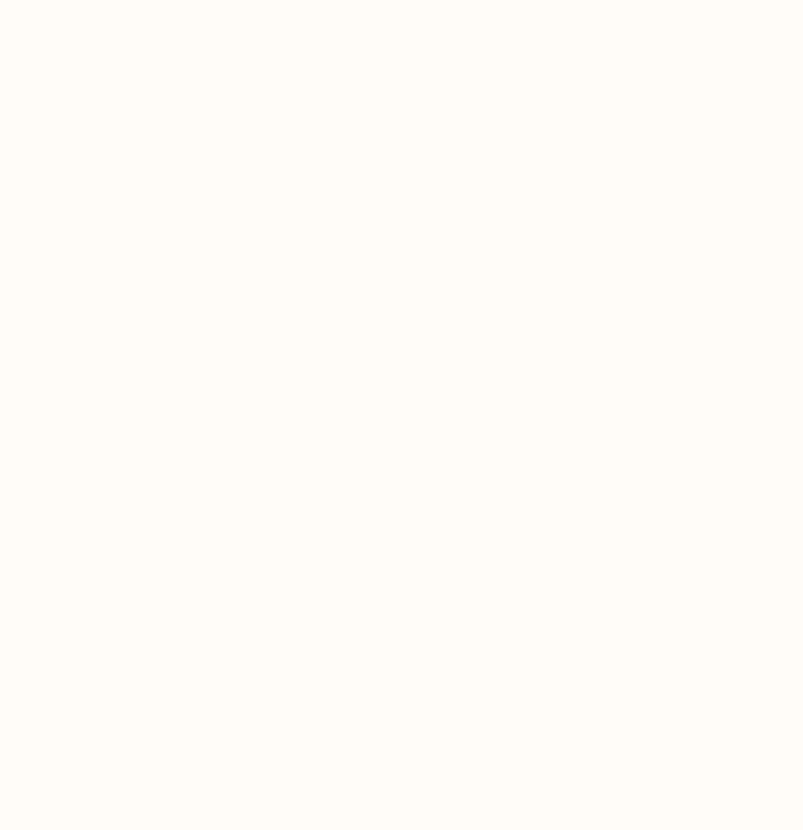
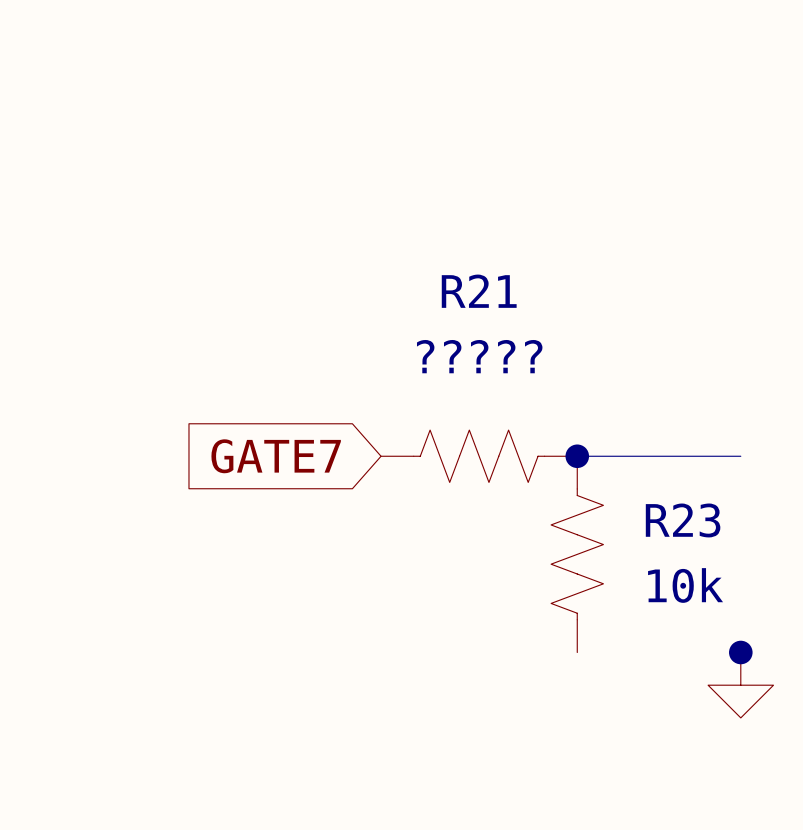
global label: none -> GATE7 (276, 456)
R21: none -> ????? (479, 456)
wire: none -> (577, 456) (740, 456)
junction: none -> (577, 456)
R23: none -> 10k (577, 554)
junction: none -> (740, 652)
power symbol: none -> (740, 685)

